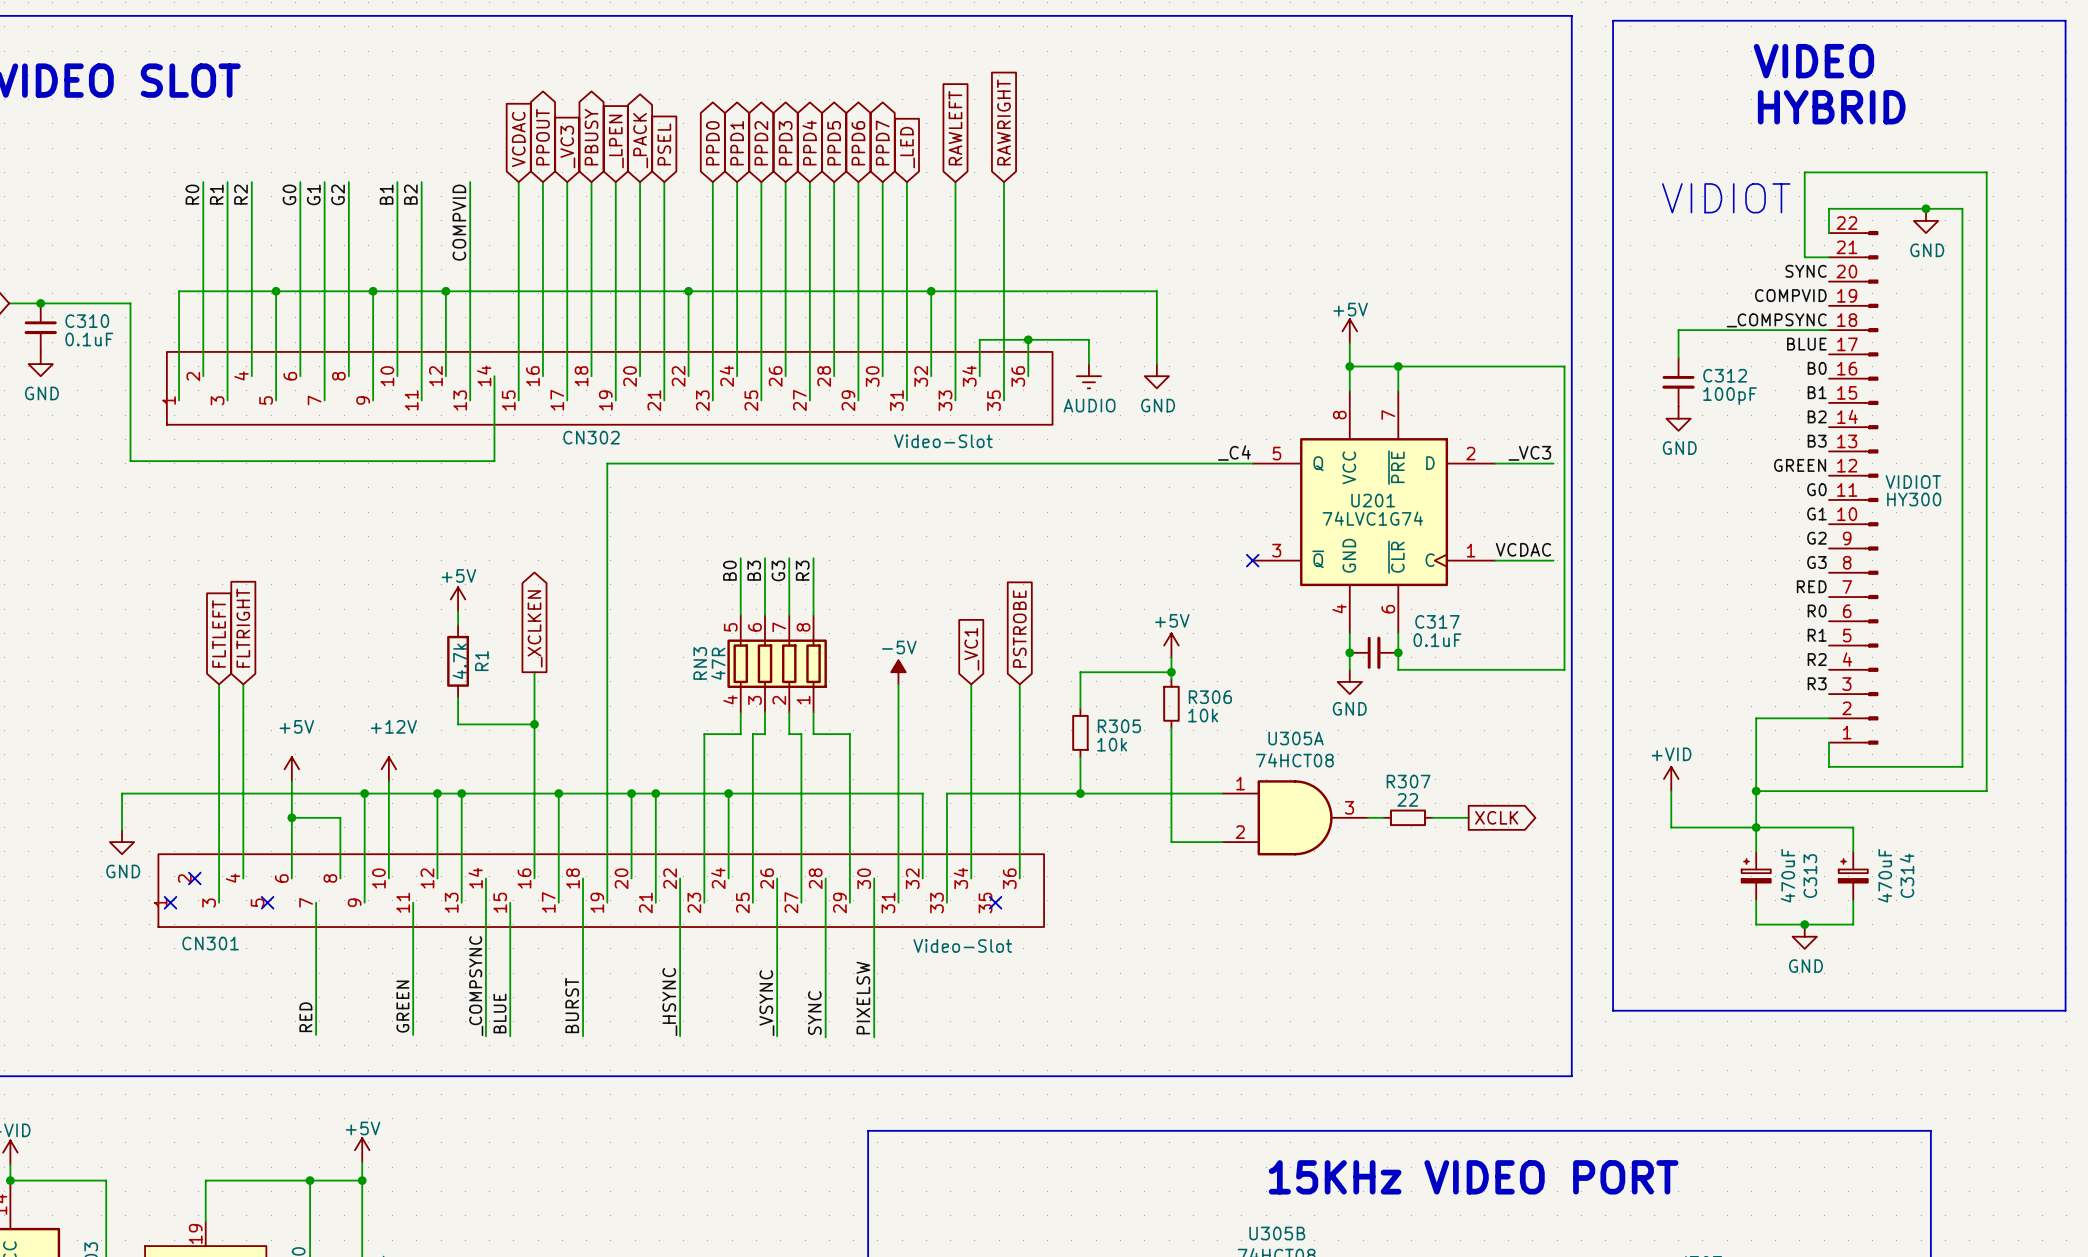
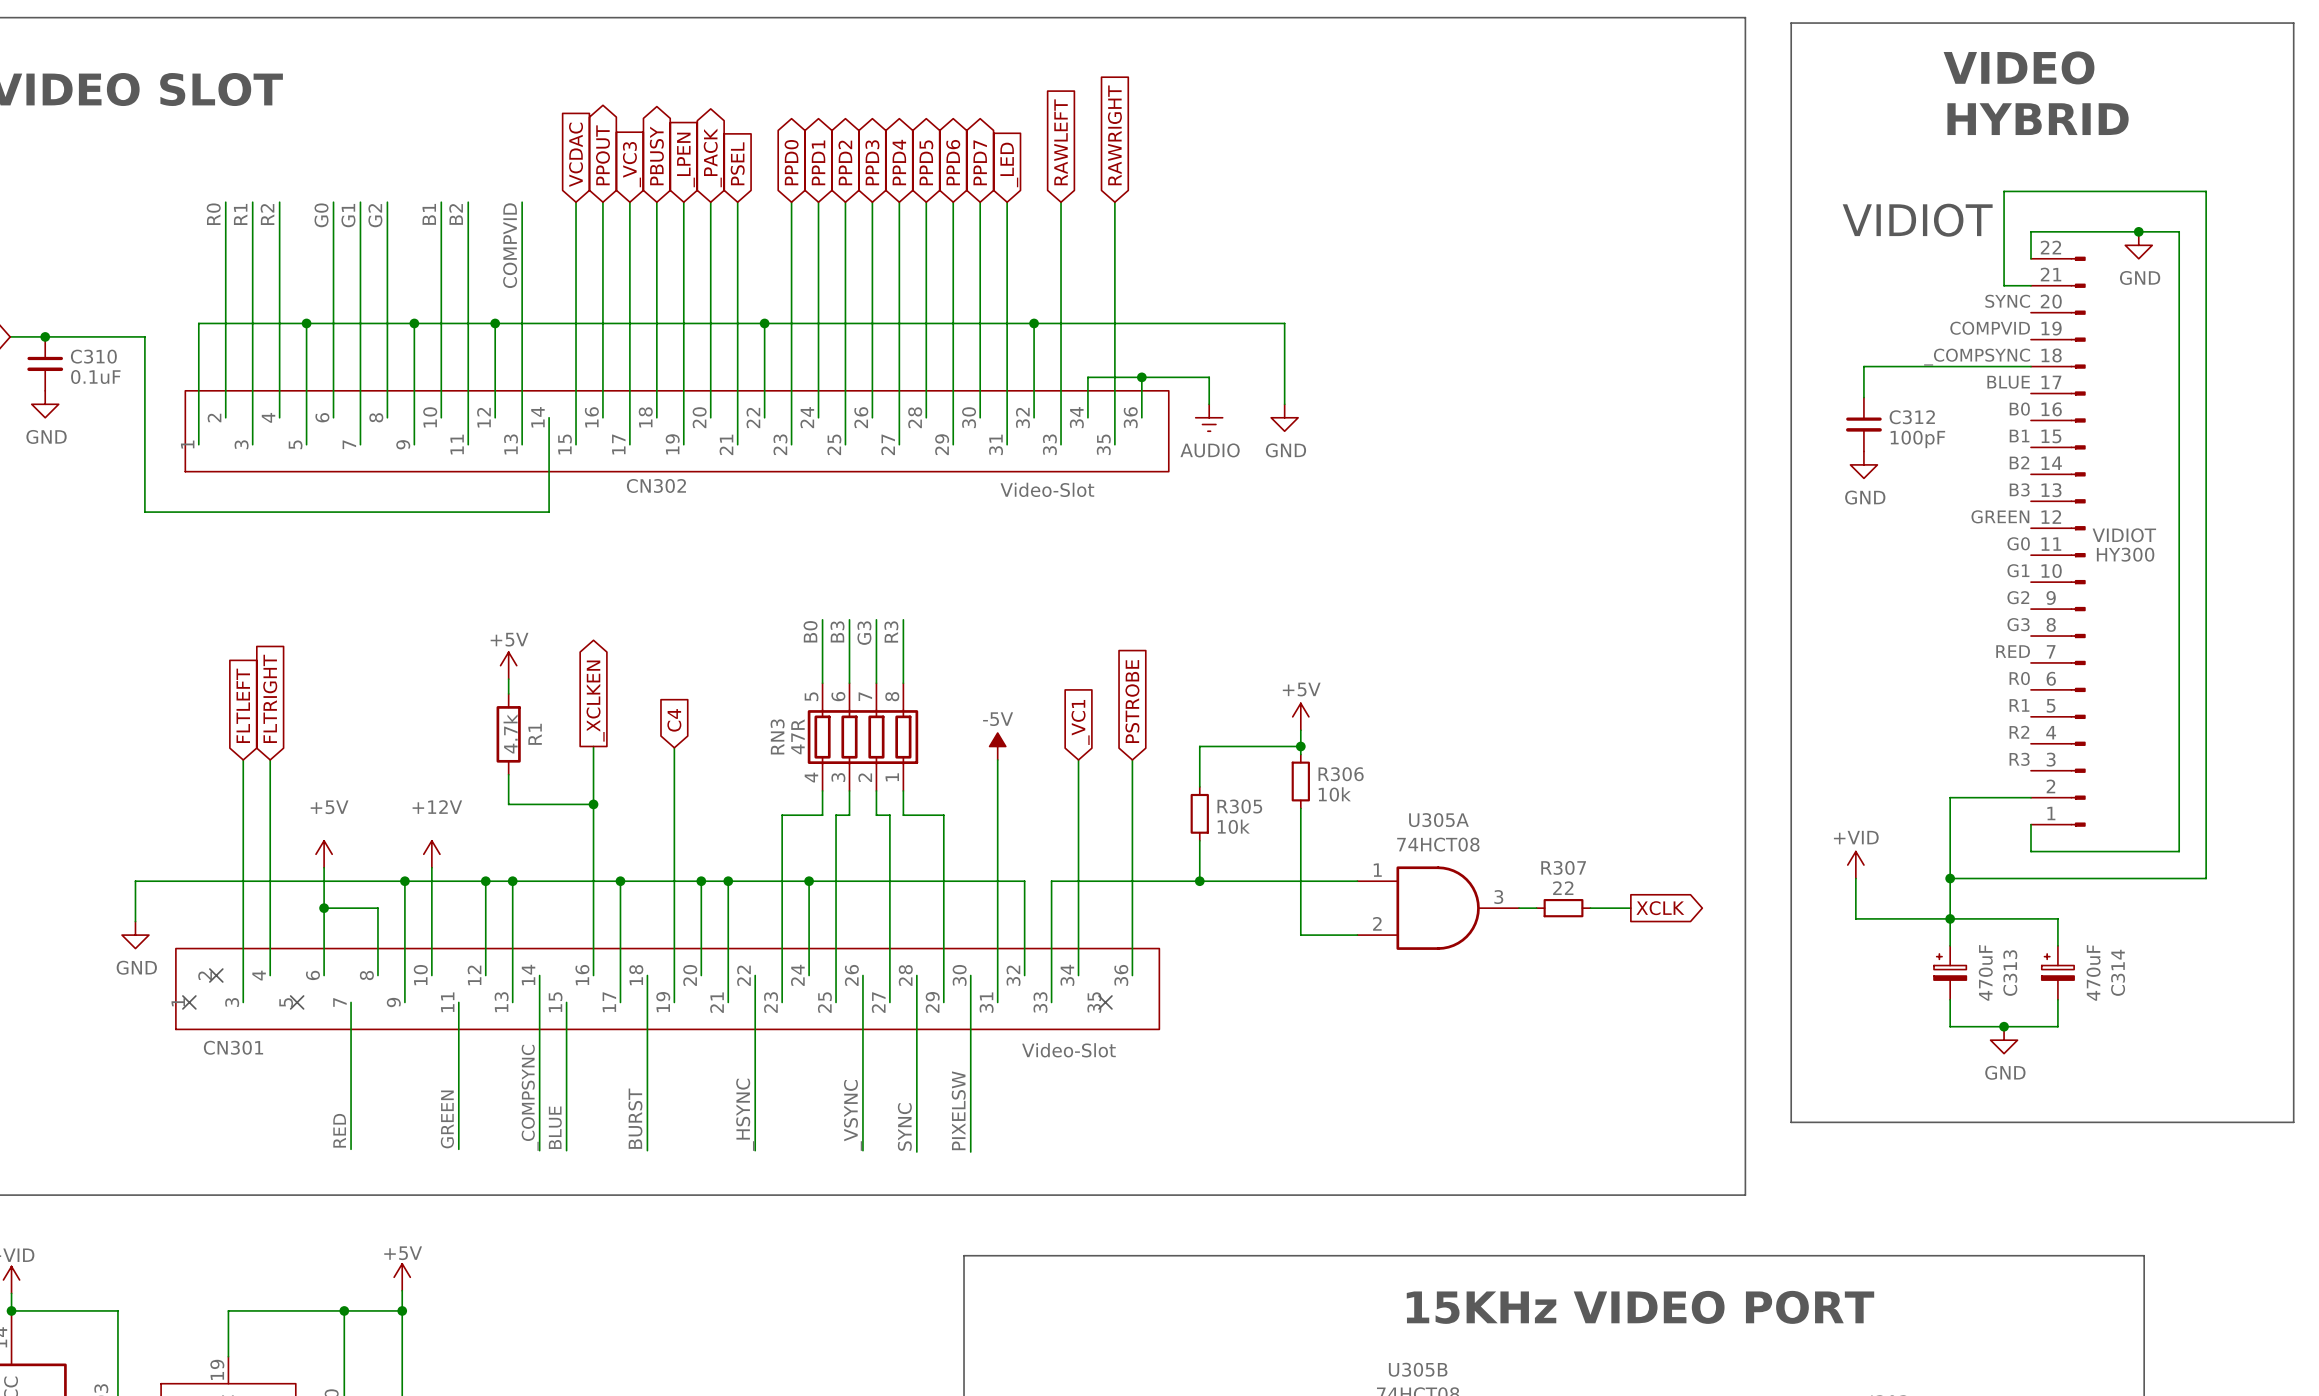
power symbol: +5V (1349, 331) -> none
wire: (1349, 343) (1349, 390) -> none
wire: (1349, 366) (1564, 366) (1564, 669) (1398, 669) (1398, 633) -> none
junction: (1349, 366) -> none
wire: (1398, 366) (1398, 390) -> none
junction: (1398, 366) -> none
label: _C4 (1234, 453) -> none
label: _VC3 (1529, 453) -> none
wire: (1252, 463) (607, 463) (607, 673) -> none
wire: (1495, 463) (1553, 463) -> none
U201: 74LVC1G74 (1374, 512) -> none
label: VCDAC (1523, 549) -> none
no-connect mark: (1252, 560) -> none
wire: (1495, 560) (1553, 560) -> none
wire: (1349, 633) (1349, 669) -> none
global label: none -> C4 (674, 720)
junction: (1349, 652) -> none
C317: 0.1uF (1374, 652) -> none
junction: (1398, 652) -> none
power symbol: GND (1349, 681) -> none

